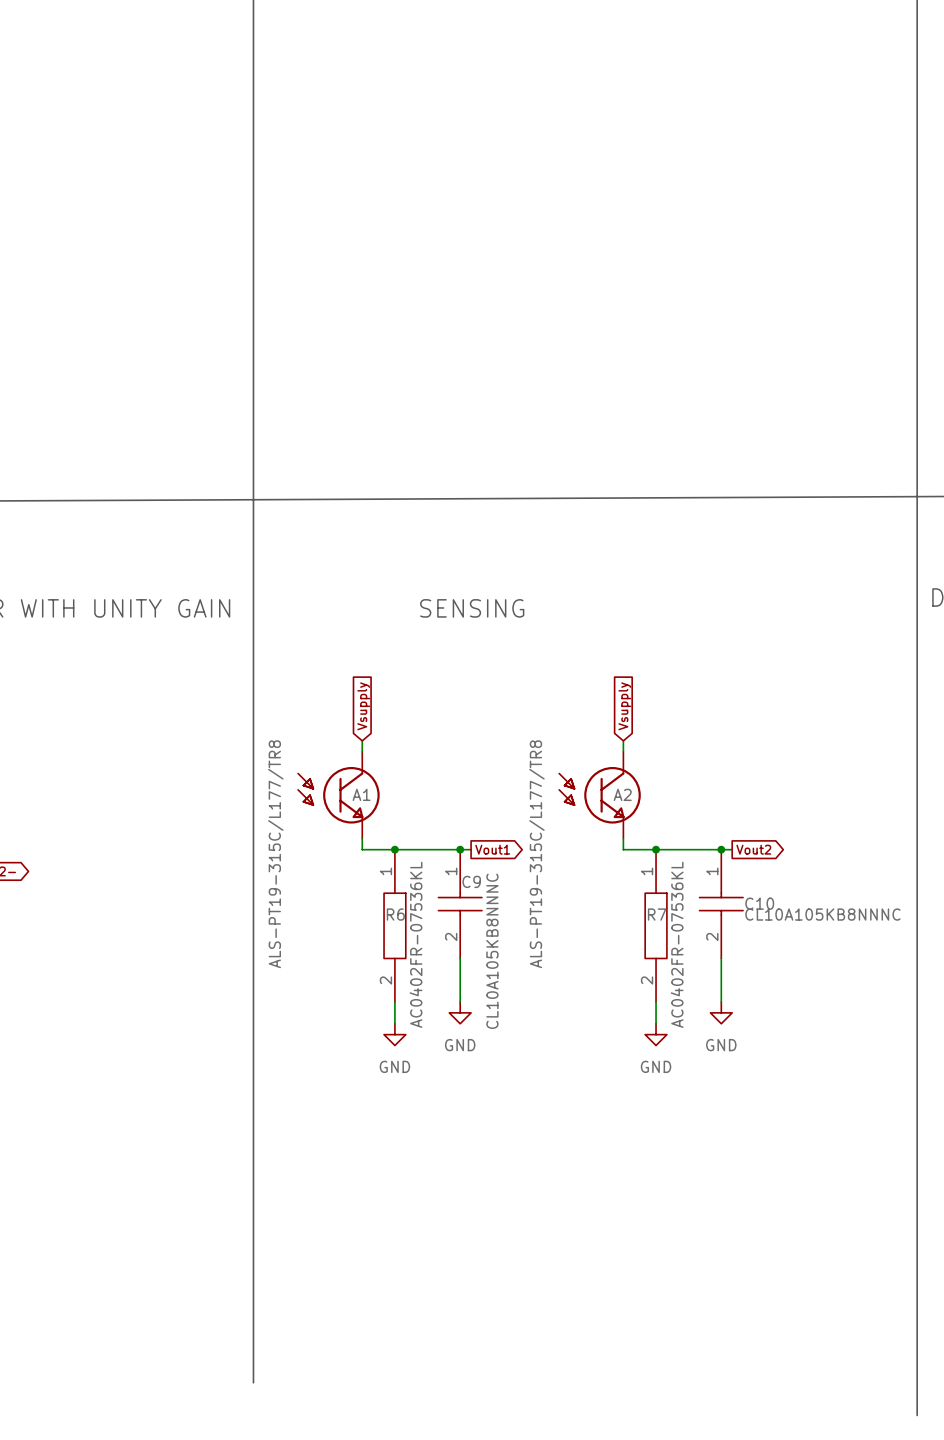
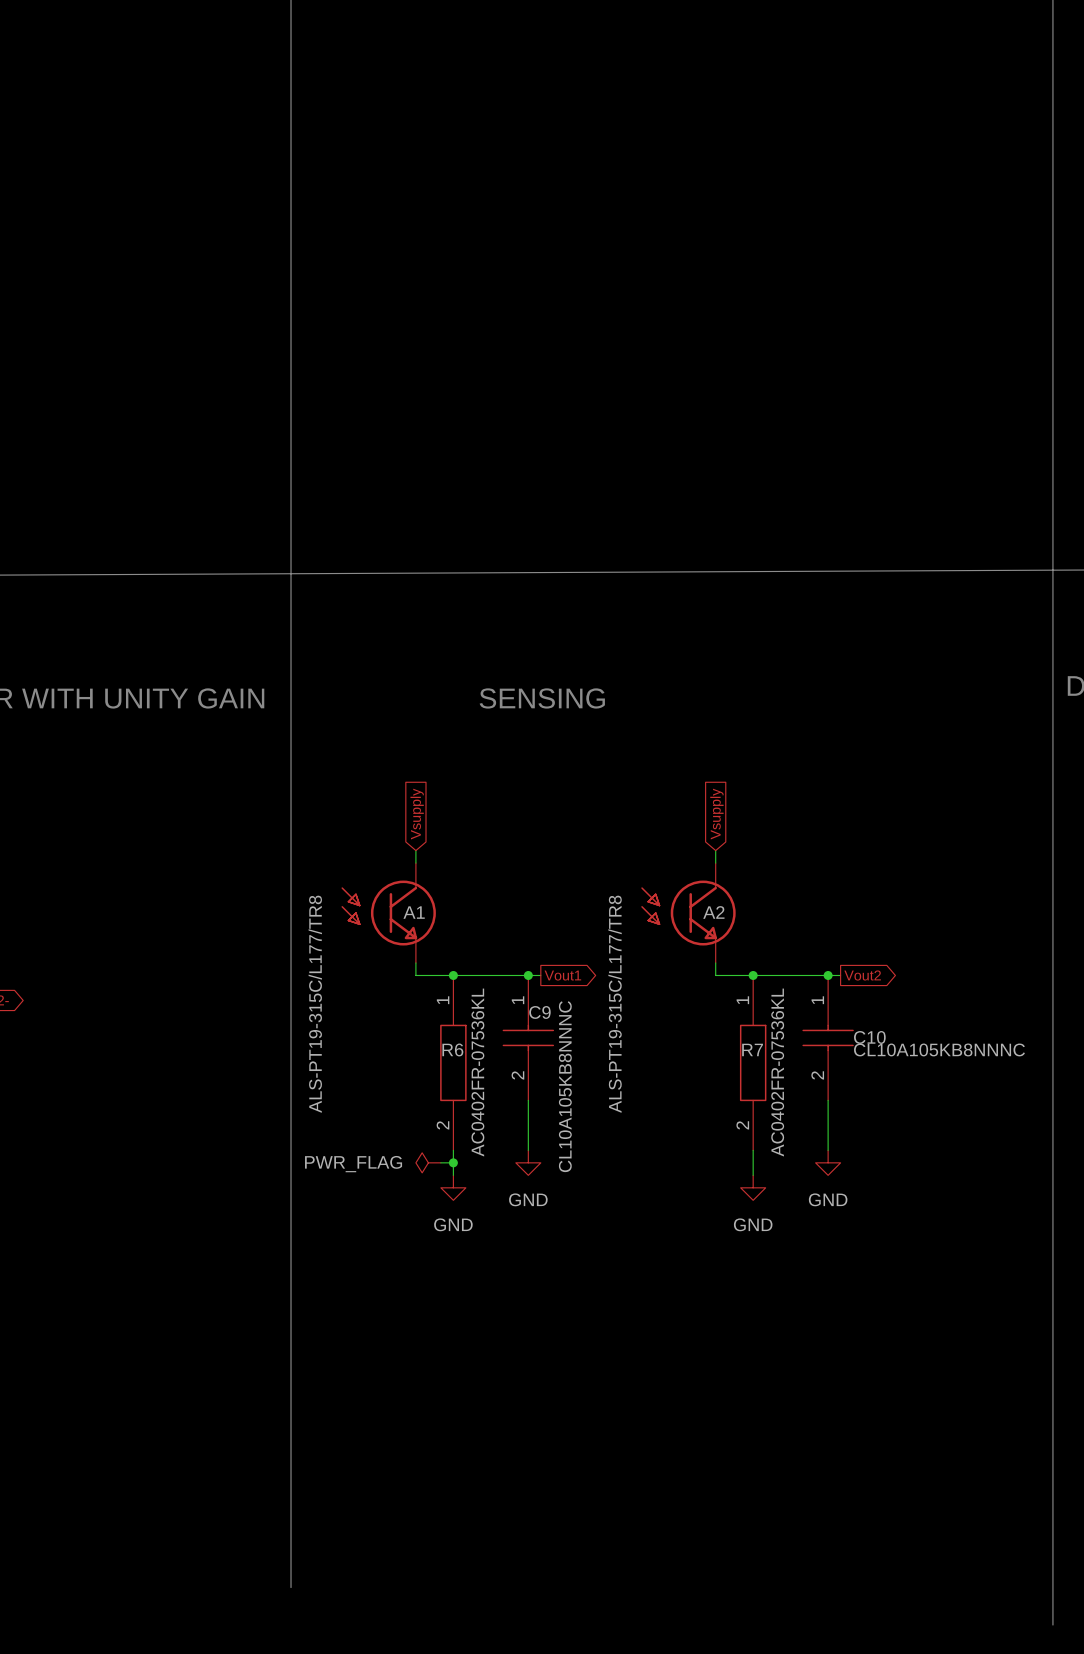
power symbol: none -> PWR_FLAG (428, 1162)
wire: none -> (440, 1162) (453, 1162)
junction: none -> (453, 1162)

